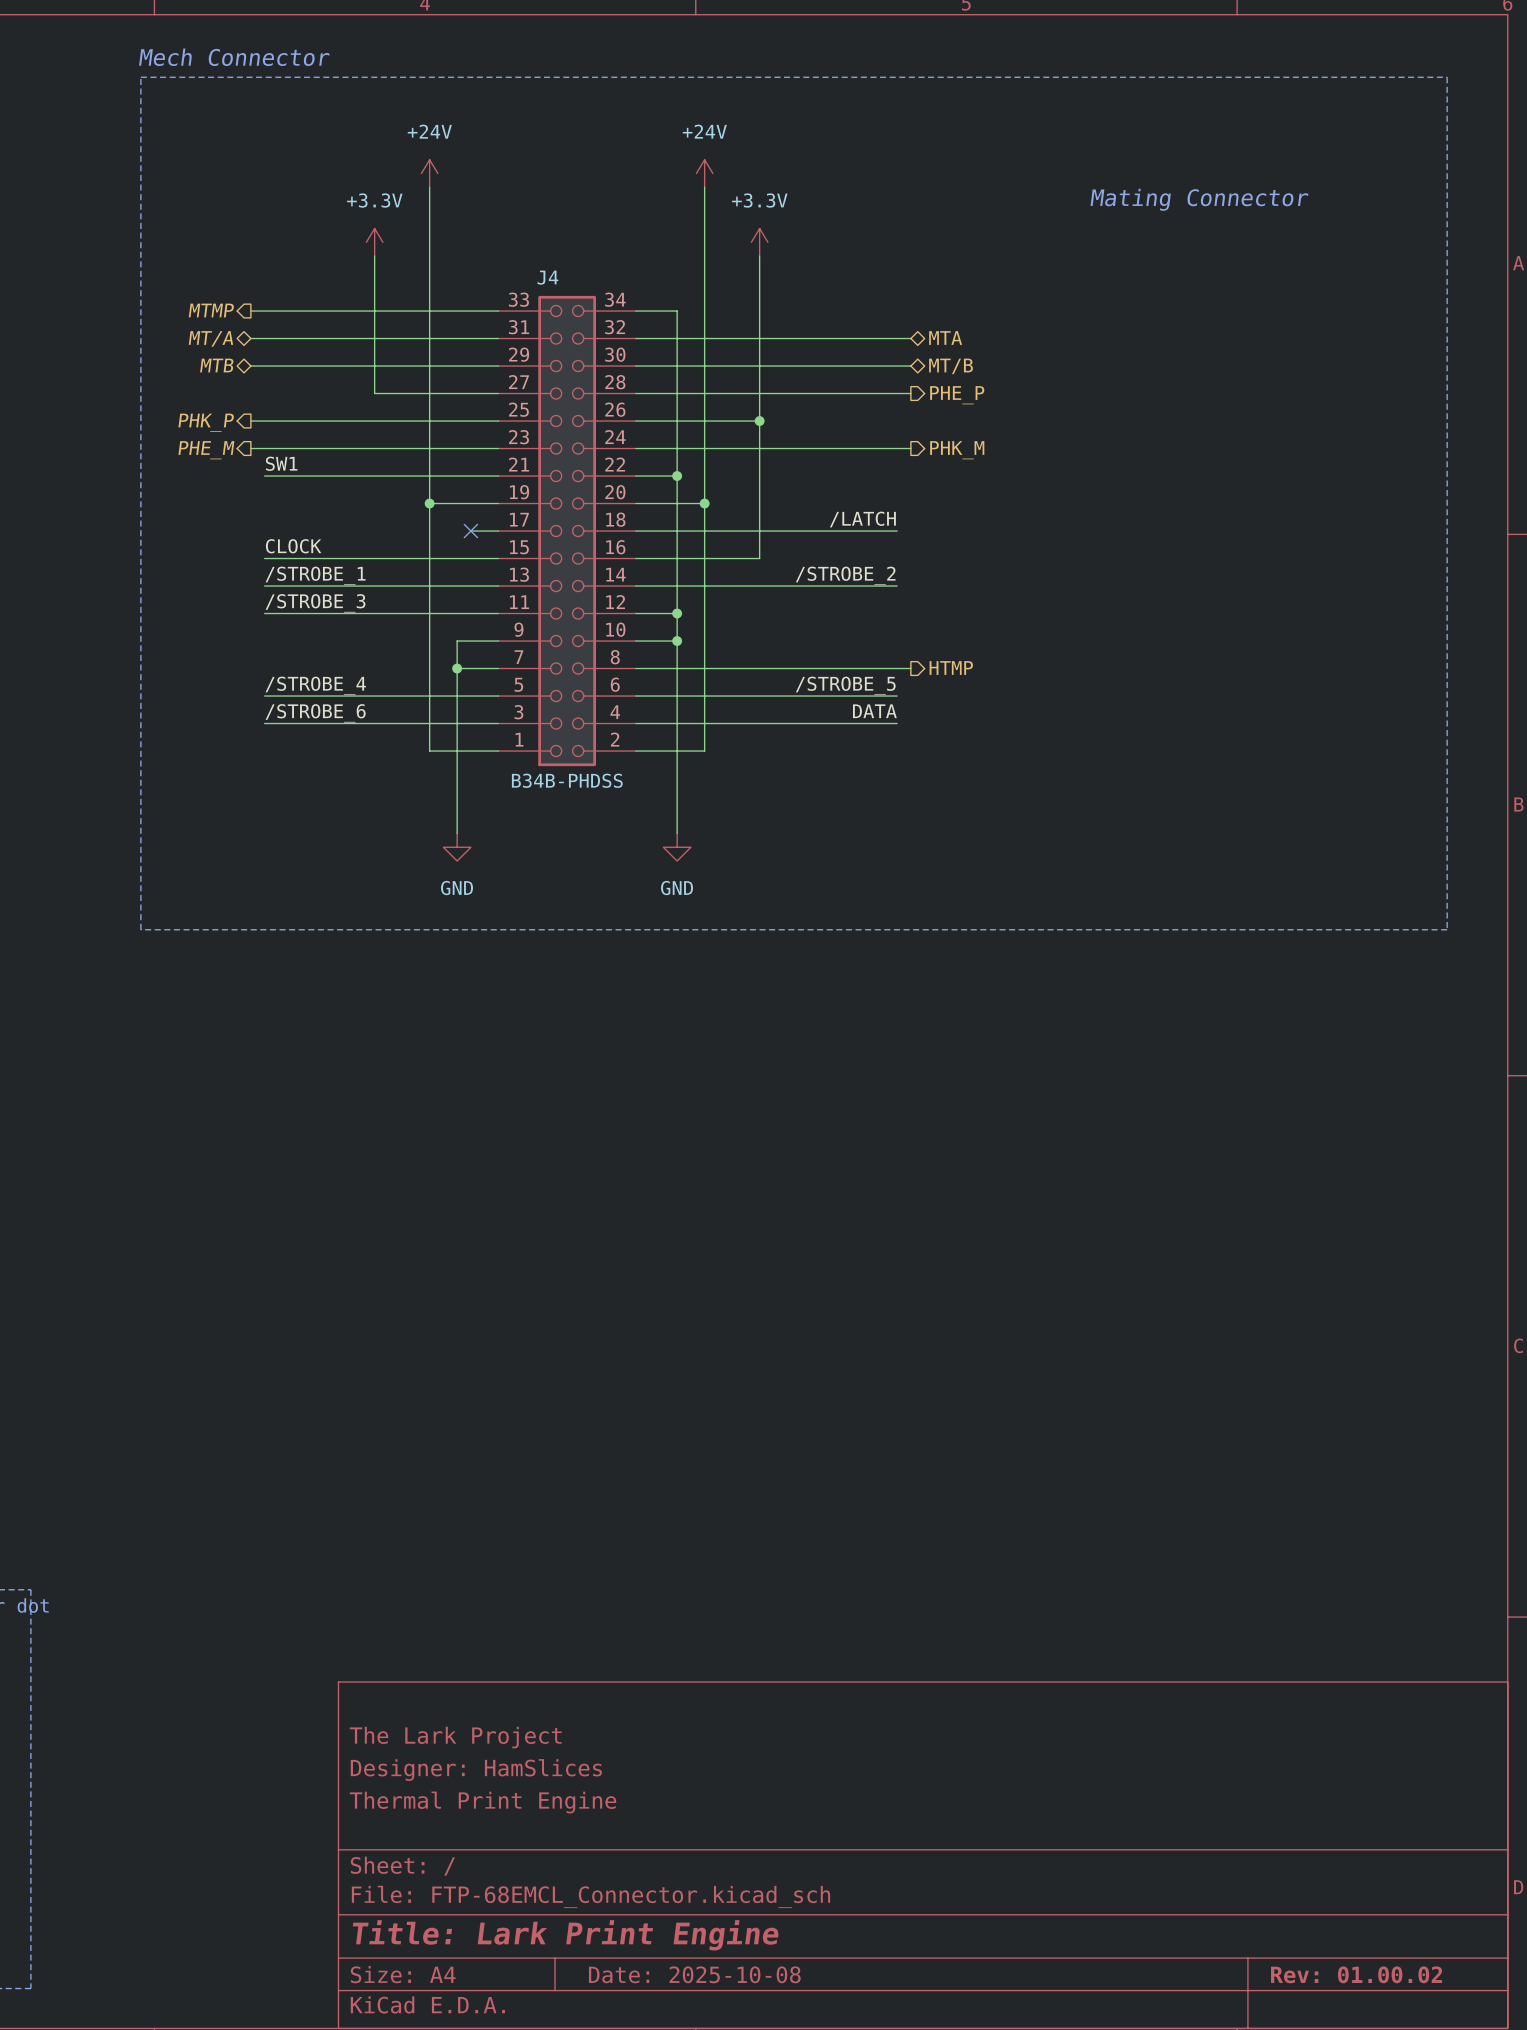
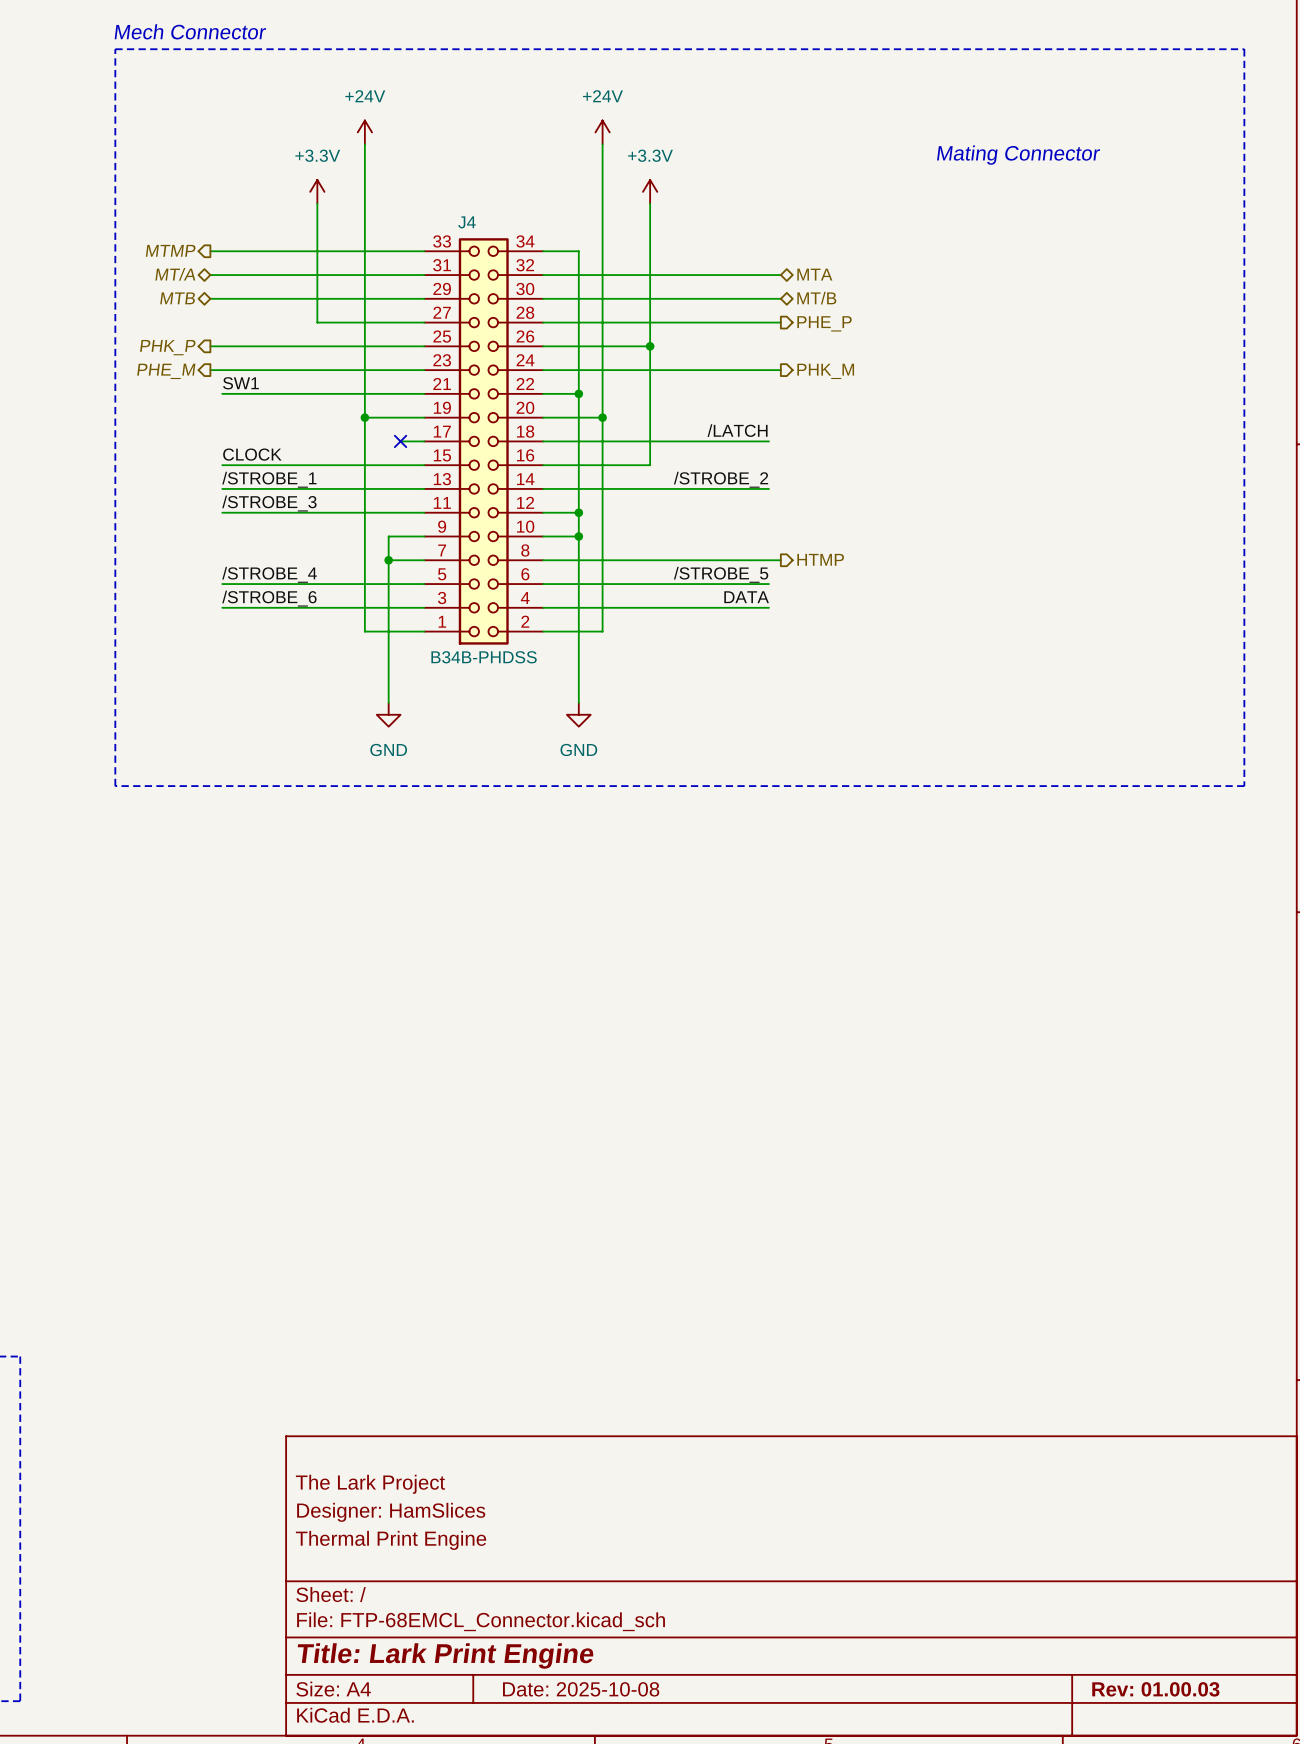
title block: Rev: 01.00.02 (1356, 1974) -> Rev: 01.00.03 (1155, 1689)

